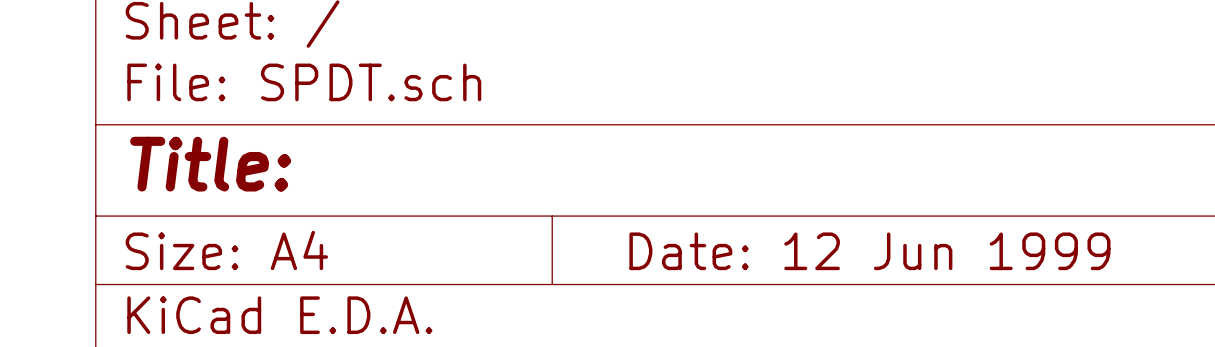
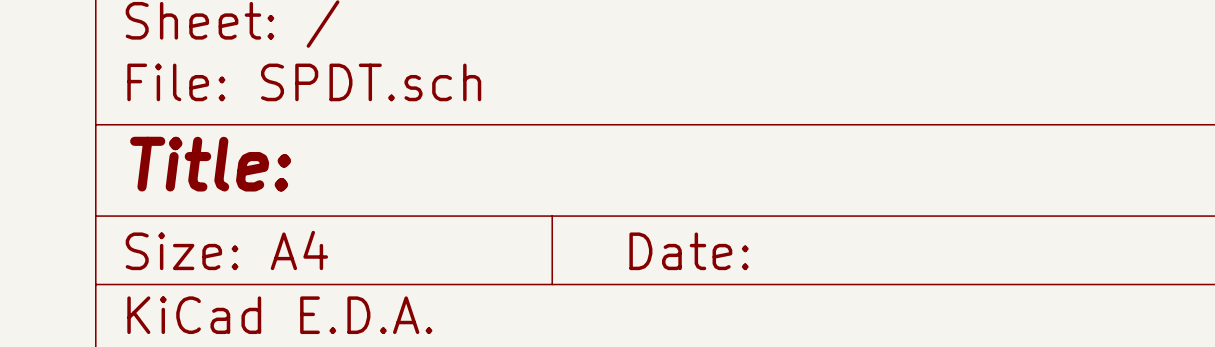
title block: Date: 12 Jun 1999 (869, 251) -> Date: (689, 251)

